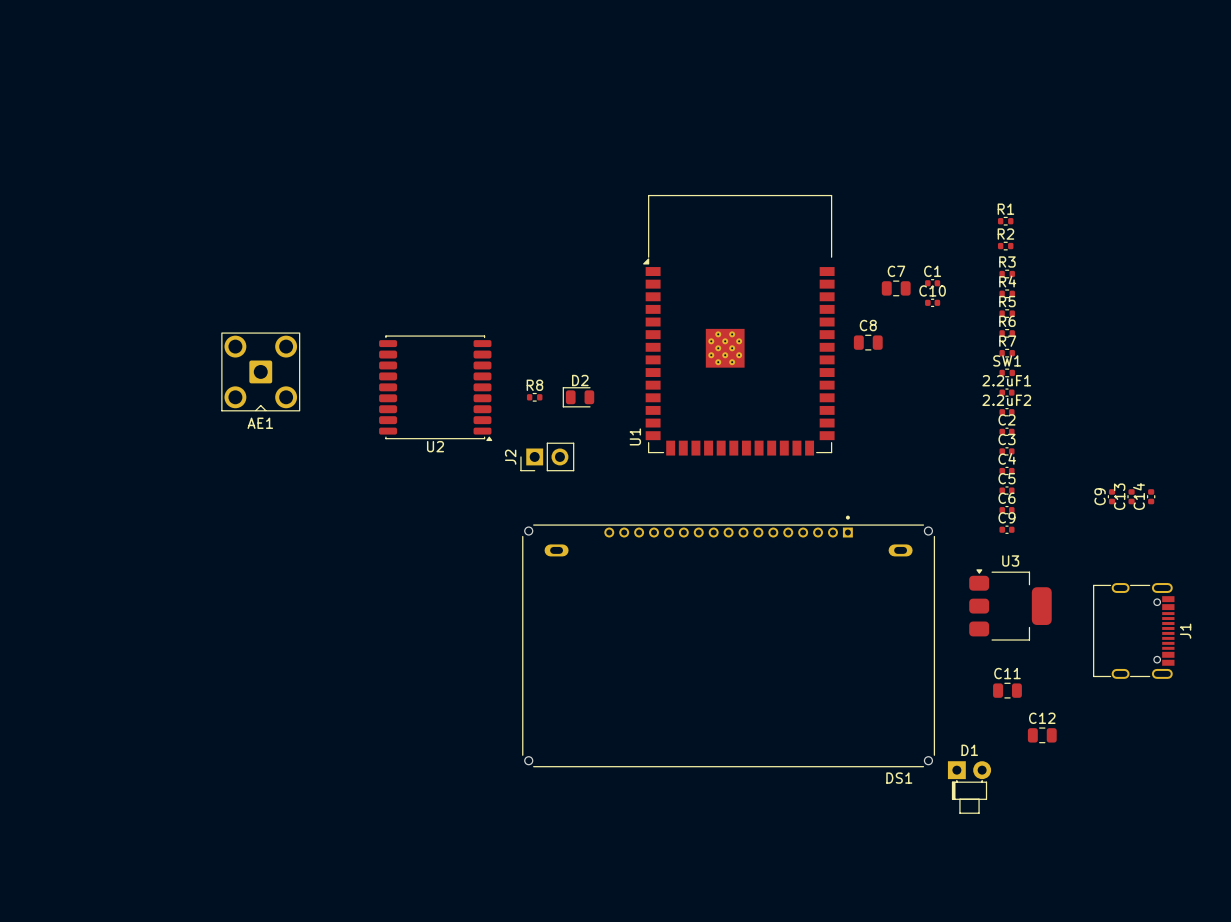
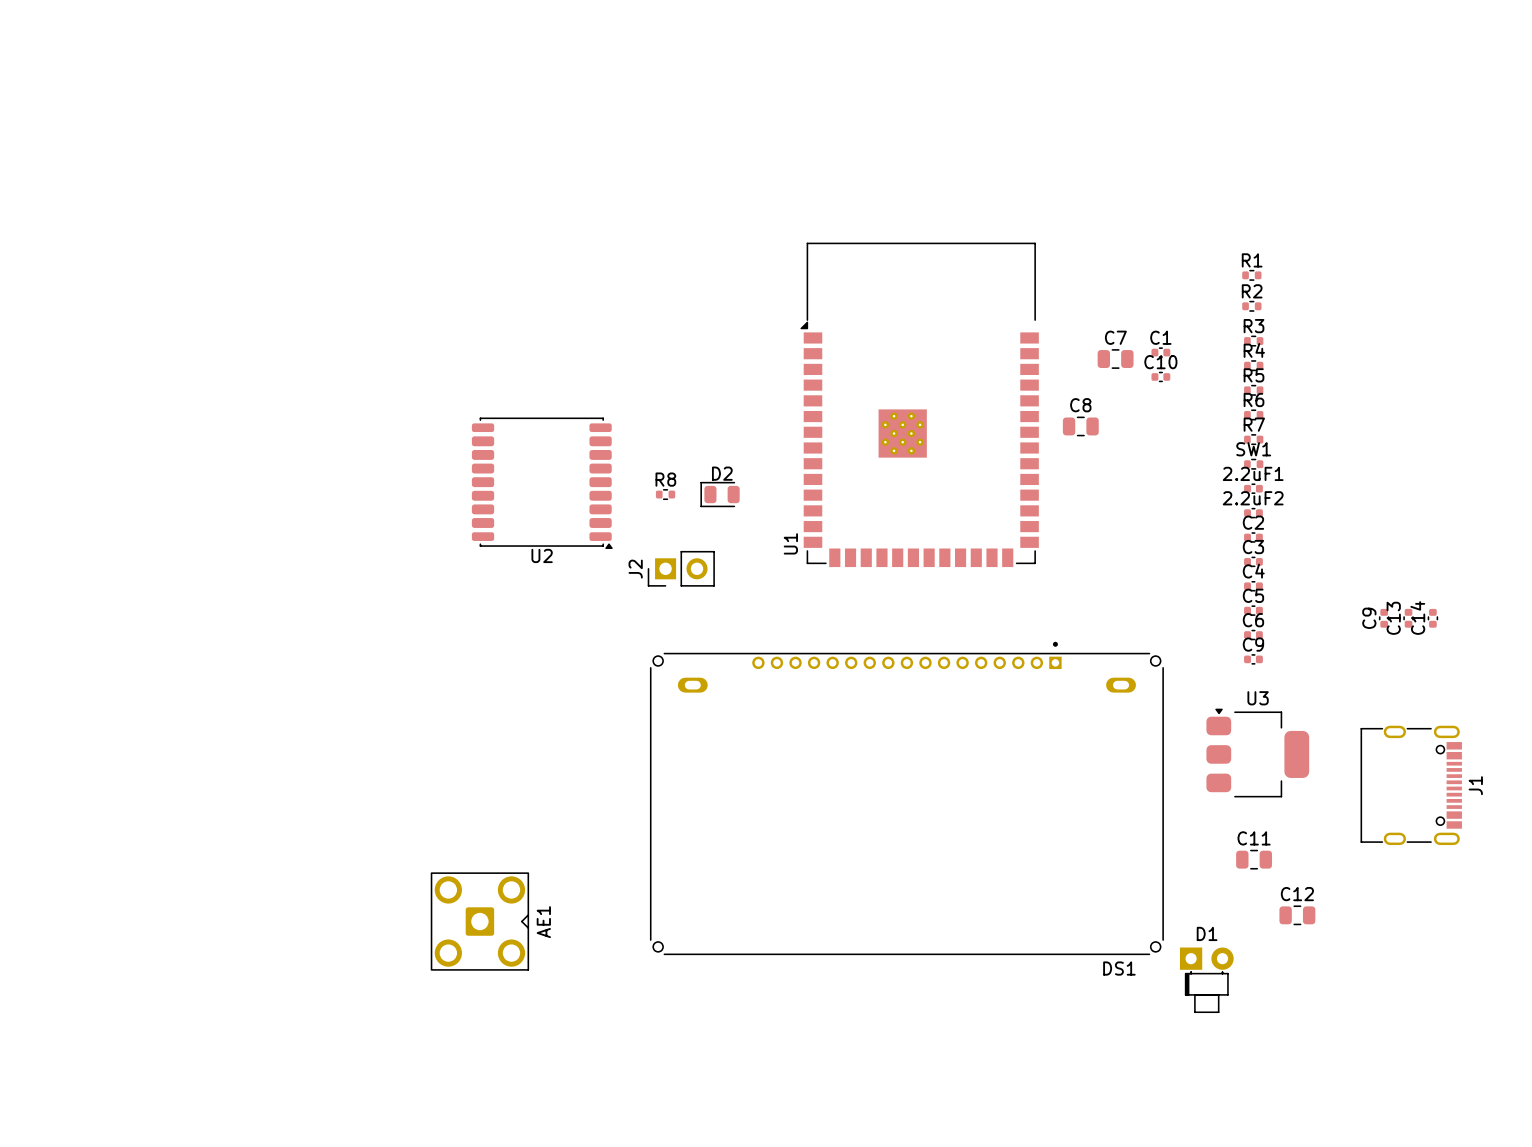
AE1 rotation: 0° (260, 371) -> 90° counterclockwise (479, 921)
AE1 position: (260, 371) -> (479, 921)

